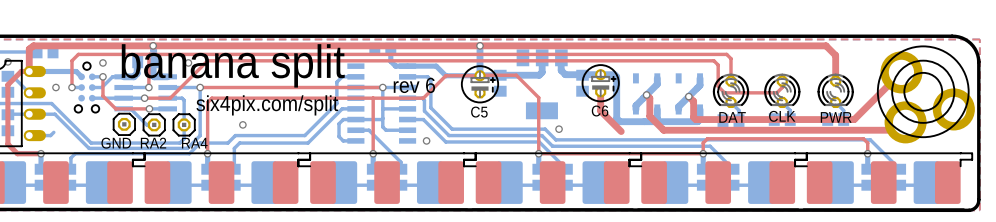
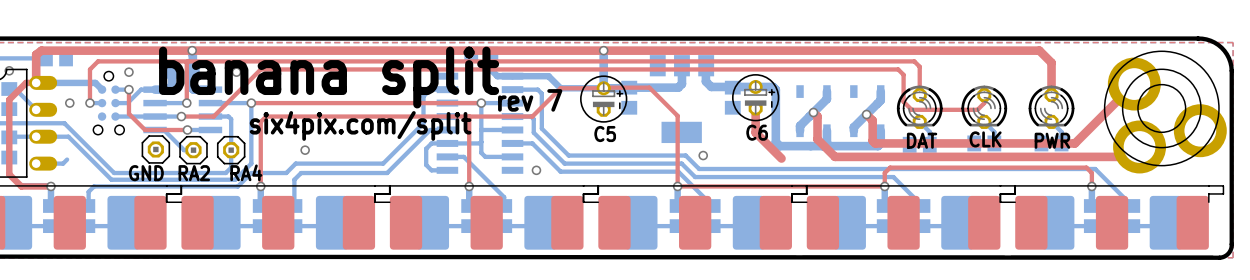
text: rev 6 (414, 85) -> rev 7 (530, 100)

